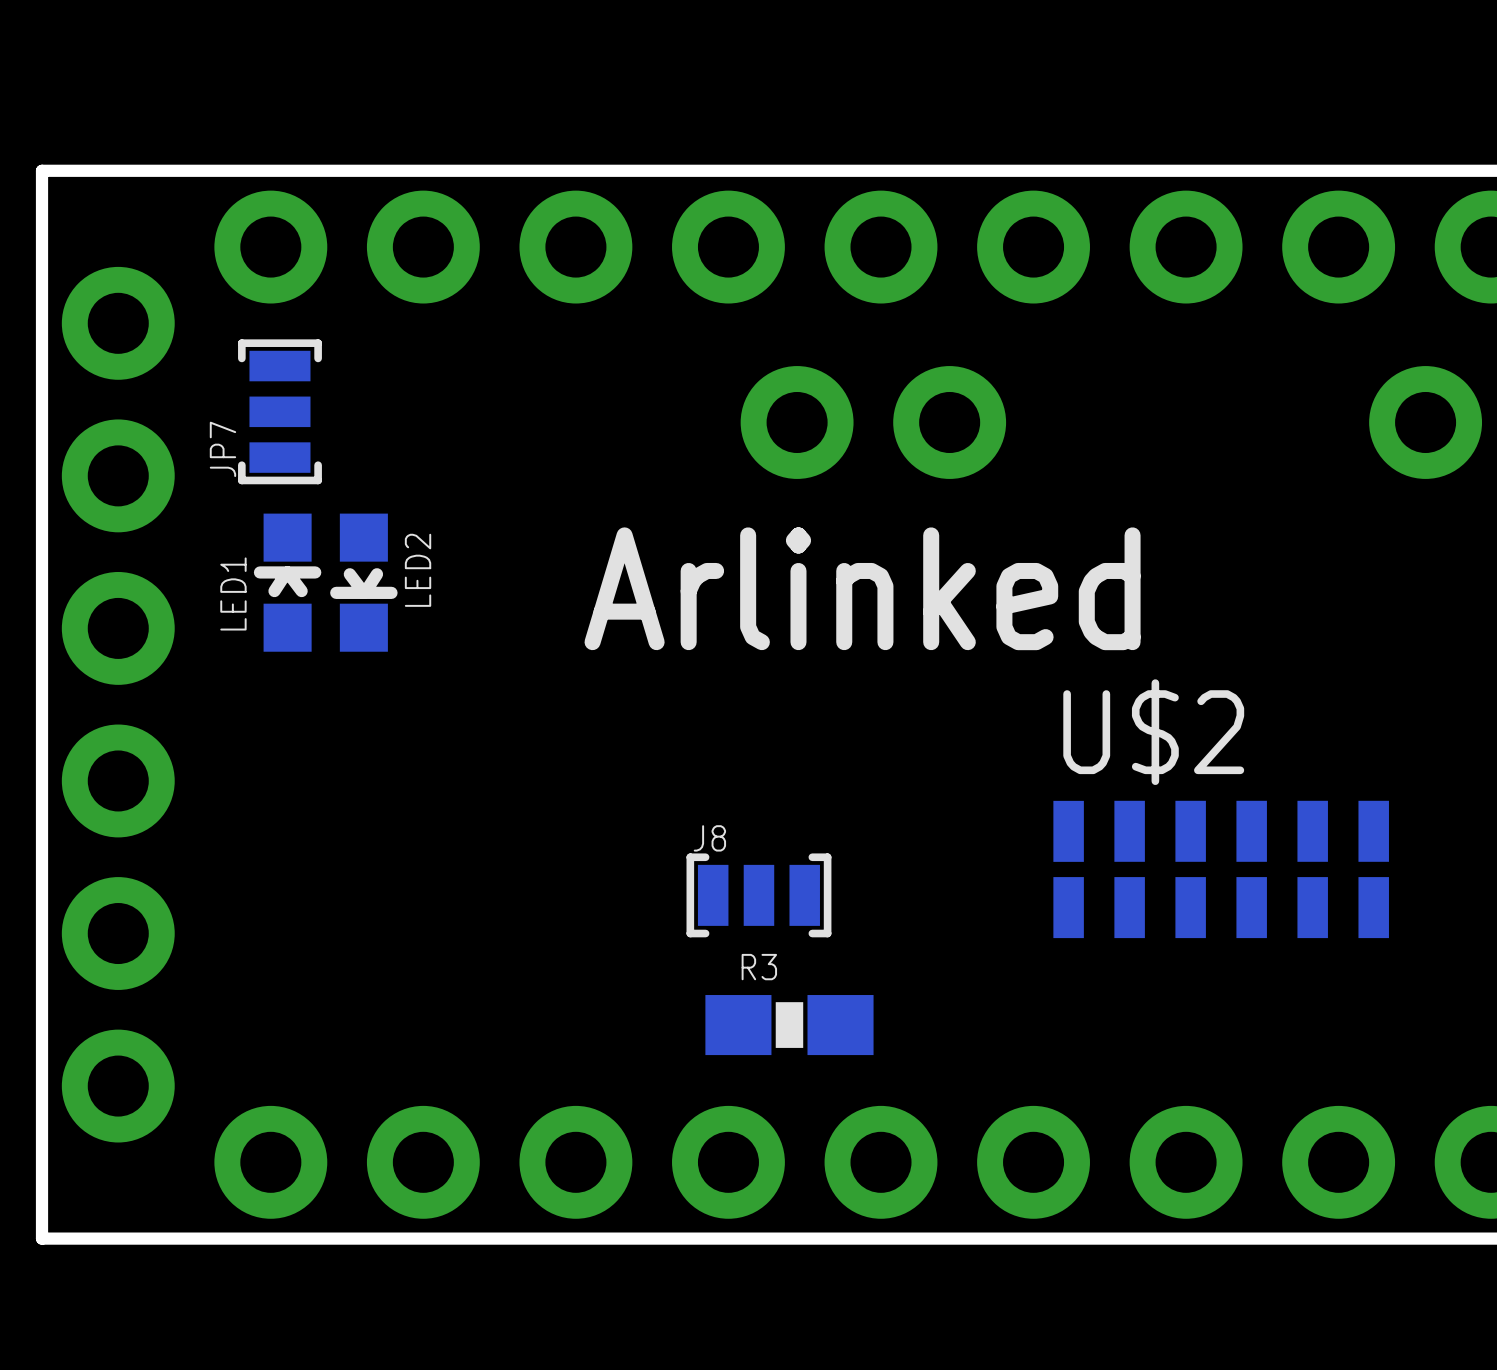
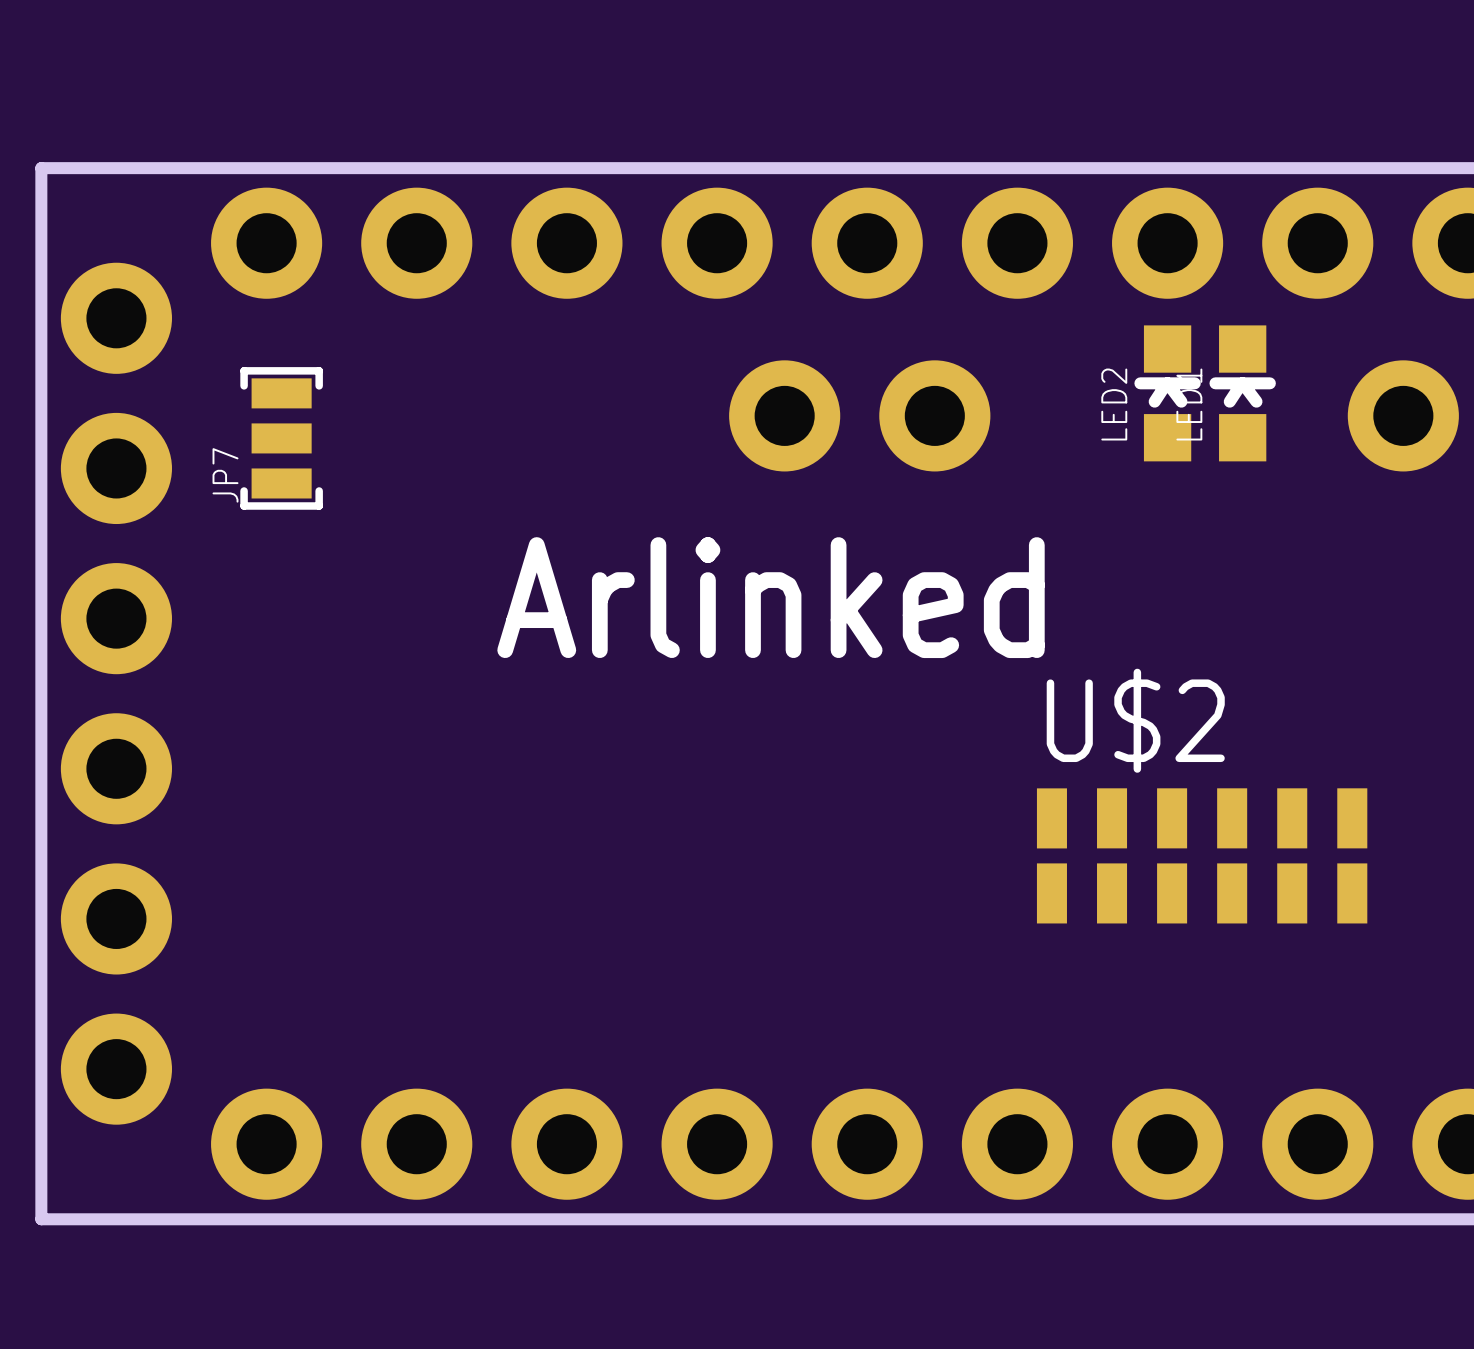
JP7 position: (279, 411) -> (281, 438)
LED1 position: (287, 582) -> (1242, 393)
LED2 rotation: 0° (363, 582) -> 180° (1167, 393)
LED2 position: (363, 582) -> (1167, 393)
text position: Arlinked (862, 588) -> Arlinked (771, 597)
J8: (758, 895) -> none
R3: (789, 1025) -> none

